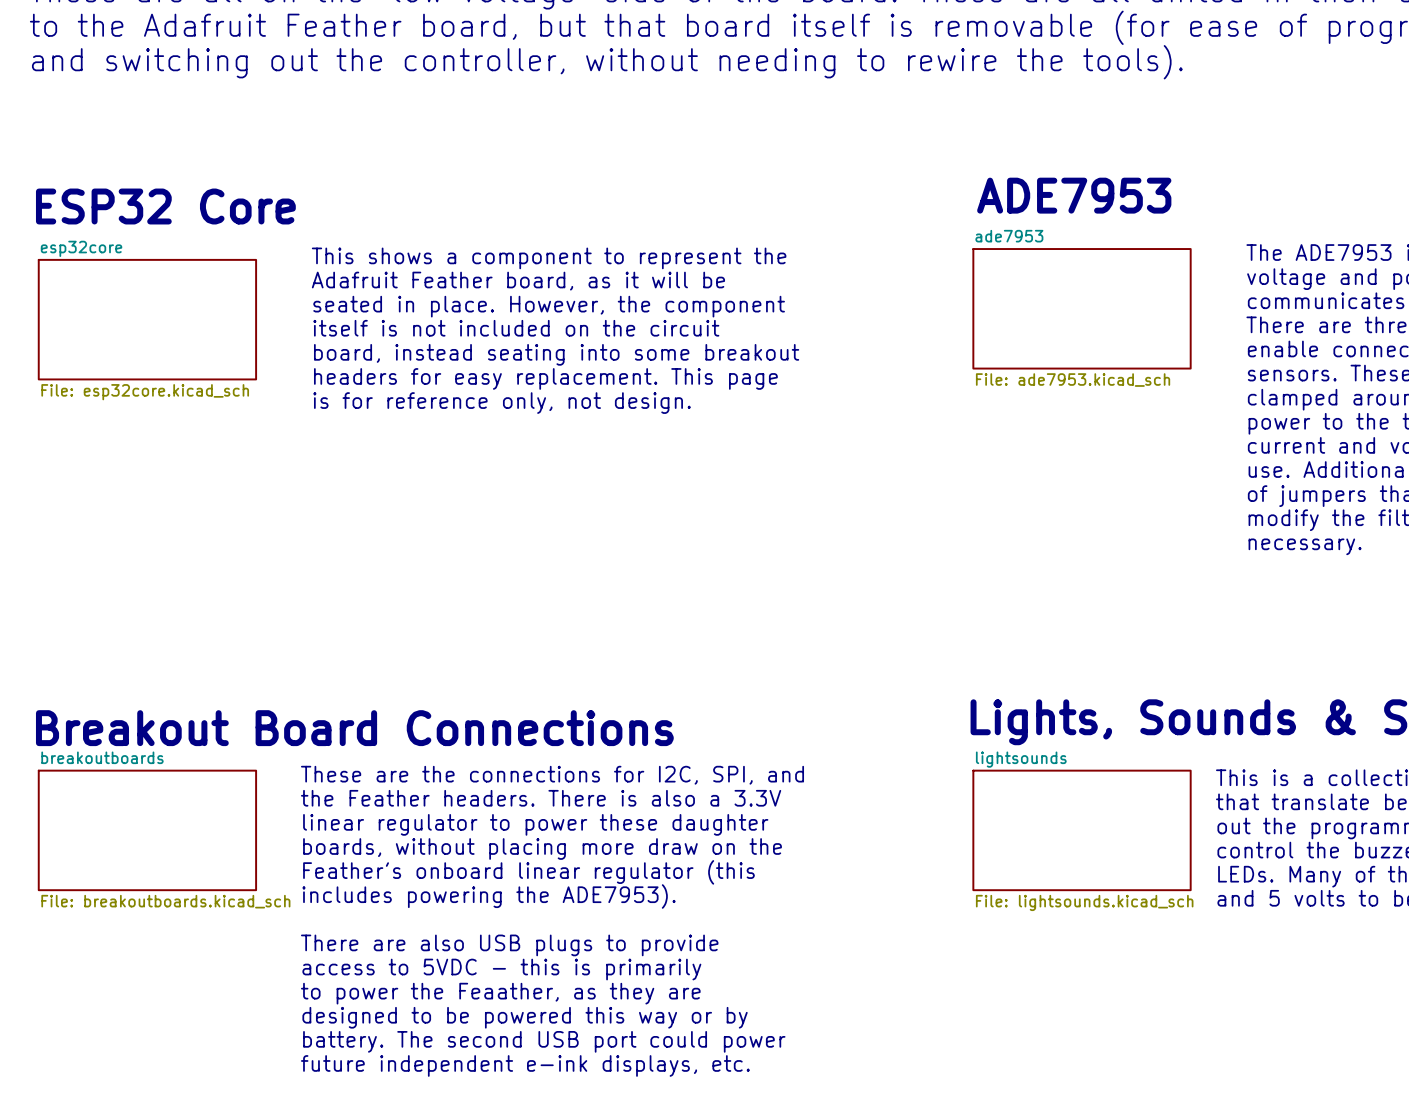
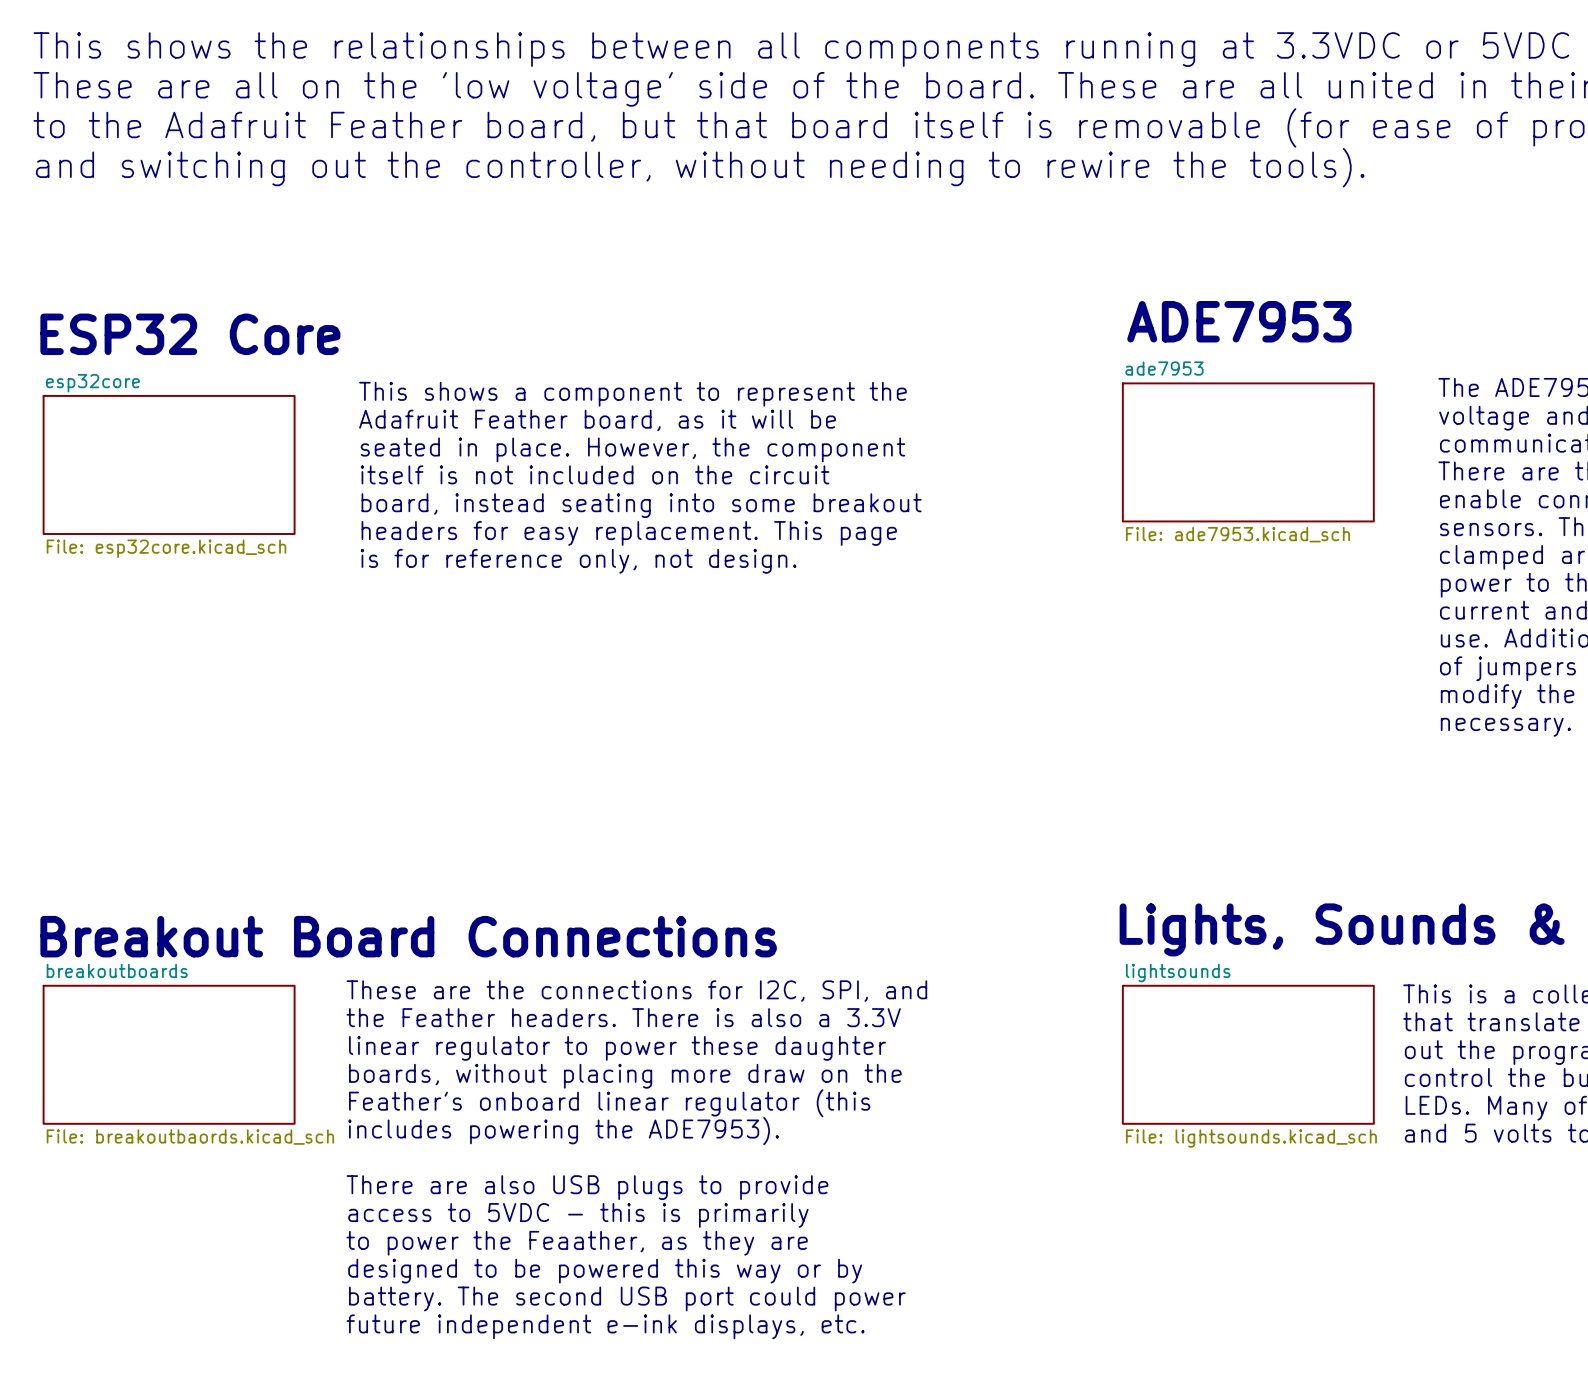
sheet breakoutboards value: File: breakoutboards.kicad_sch (165, 901) -> File: breakoutbaords.kicad_sch (190, 1137)

